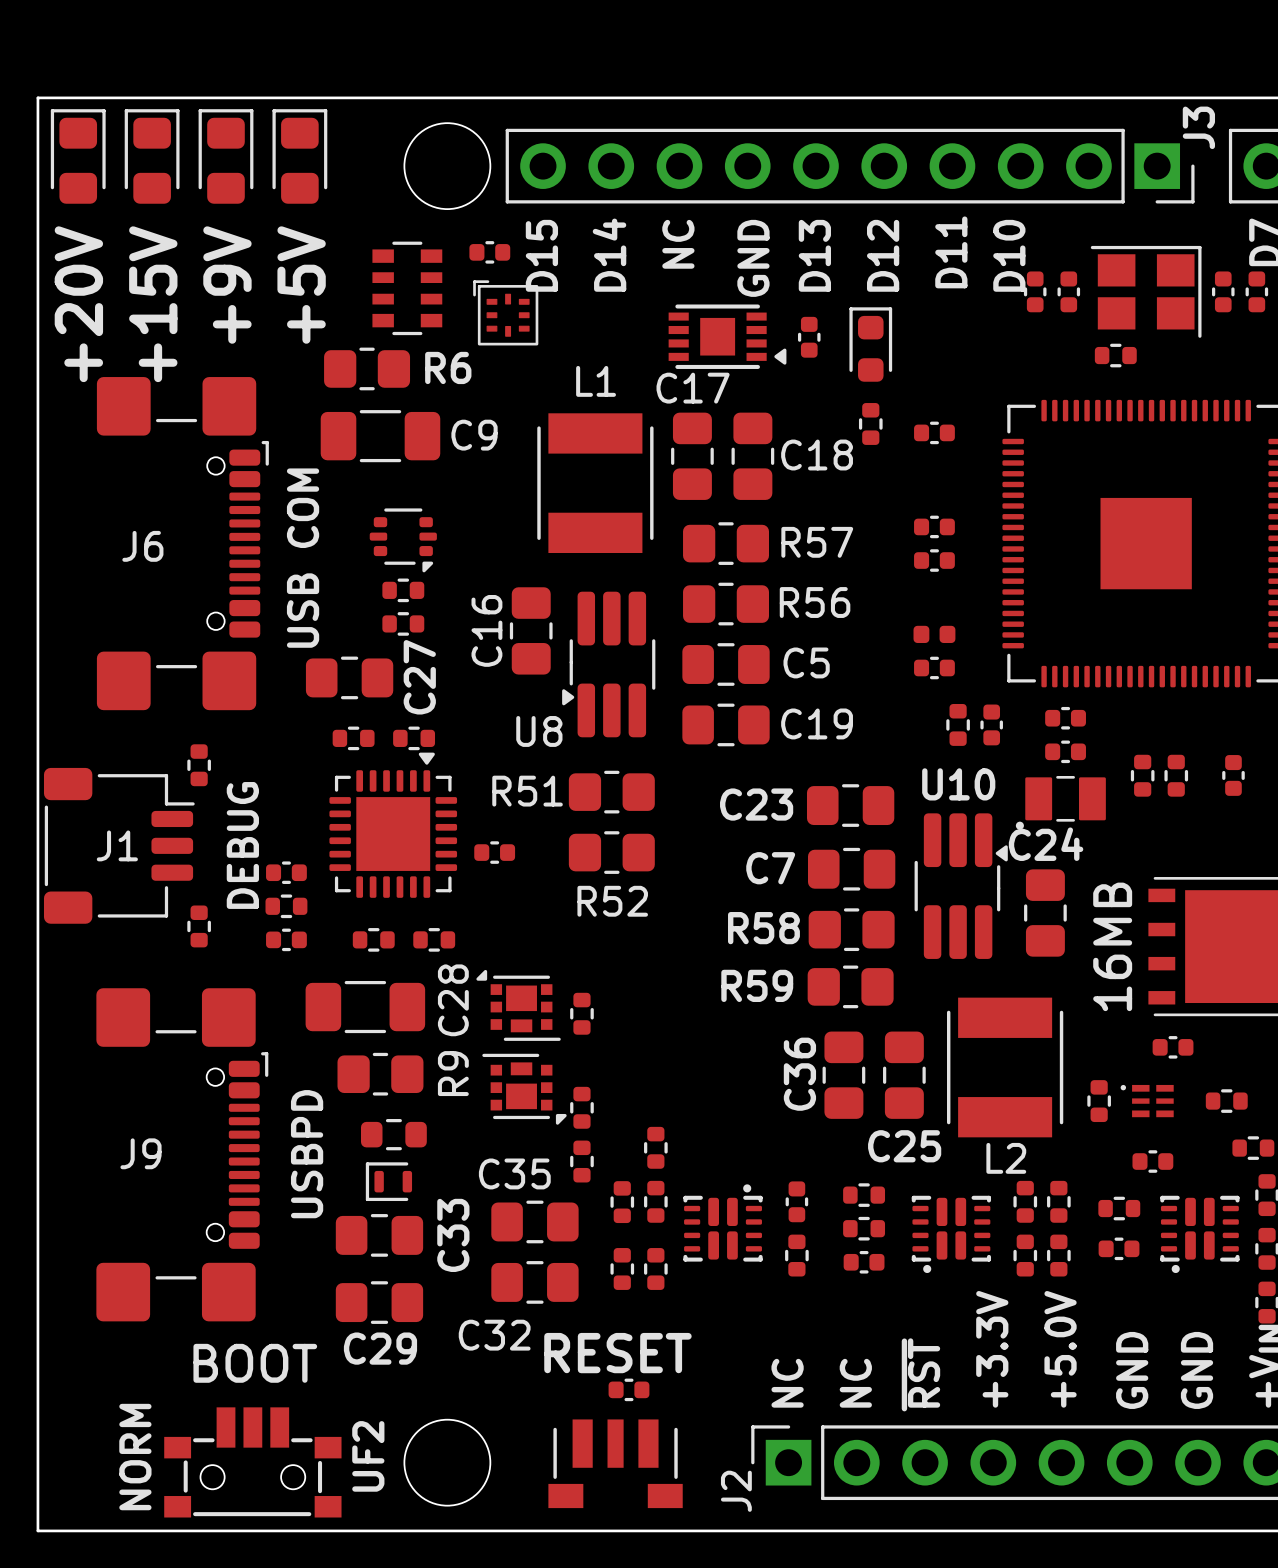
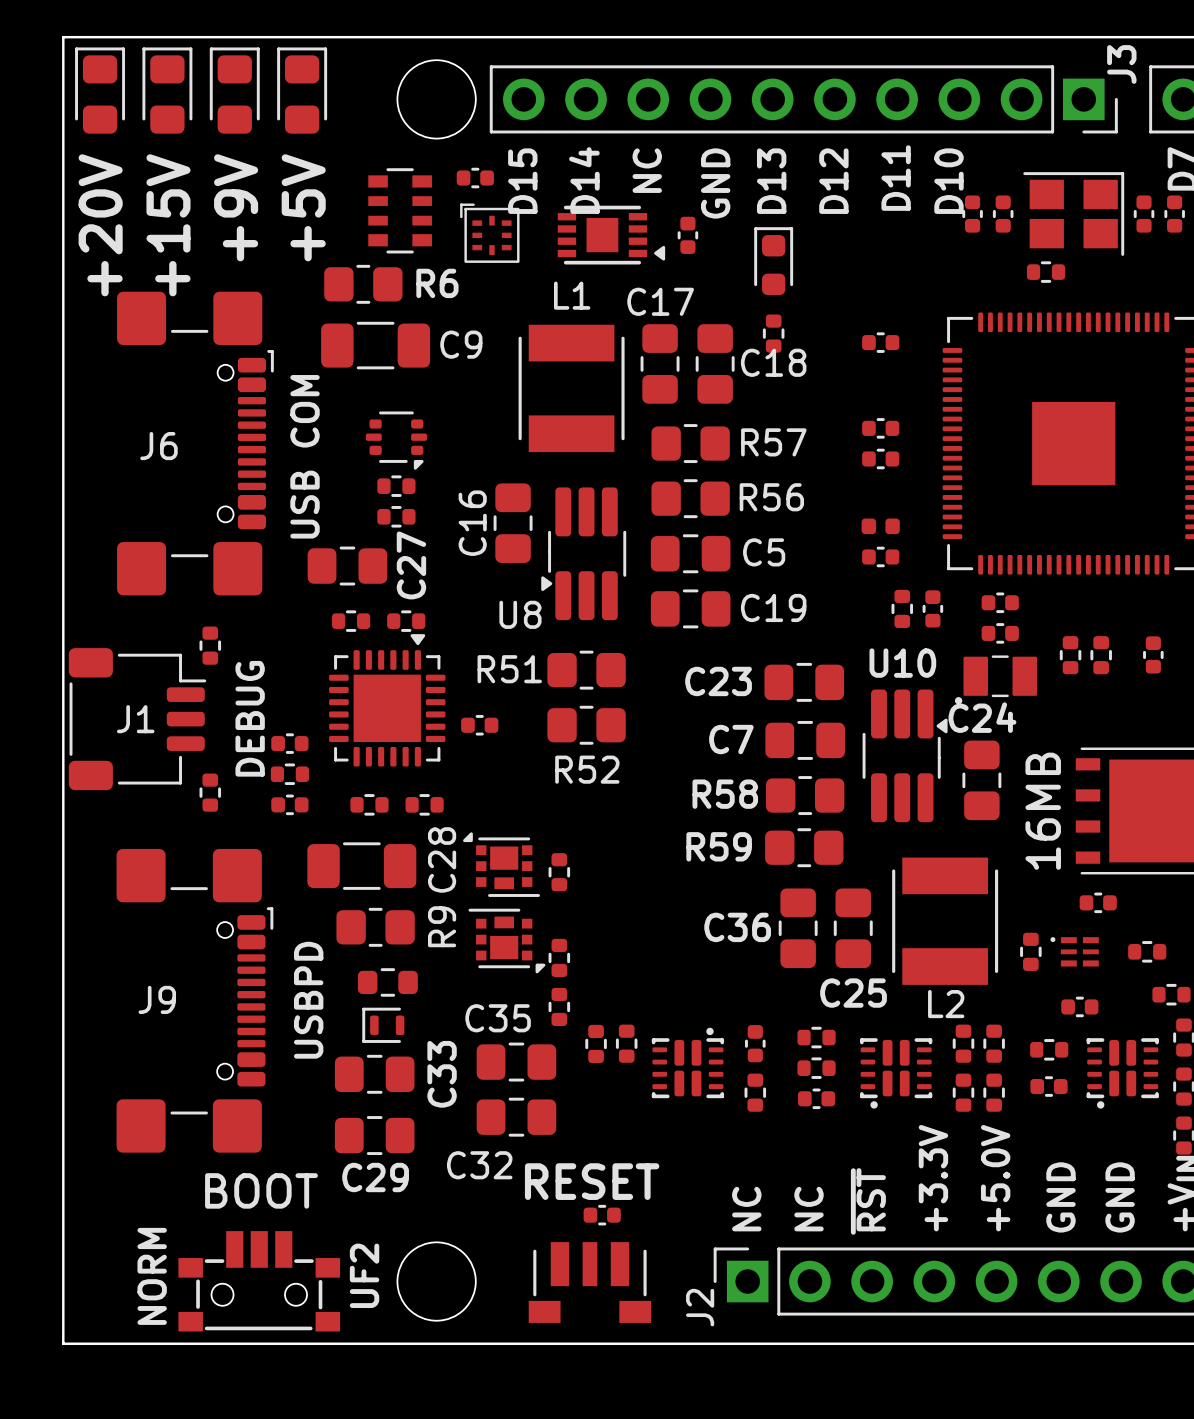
part footprint: [668, 304, 787, 369] -> [677, 216, 699, 254]
part: none -> (611, 235)
part footprint: [797, 316, 821, 358] -> [754, 227, 794, 296]
part: (870, 344) -> none
part position: (870, 423) -> (773, 333)
C36 name rotation: 0° (799, 1074) -> 90° clockwise (737, 927)
part: (655, 1147) -> none
part: (622, 1268) -> none
part: (655, 1268) -> none

